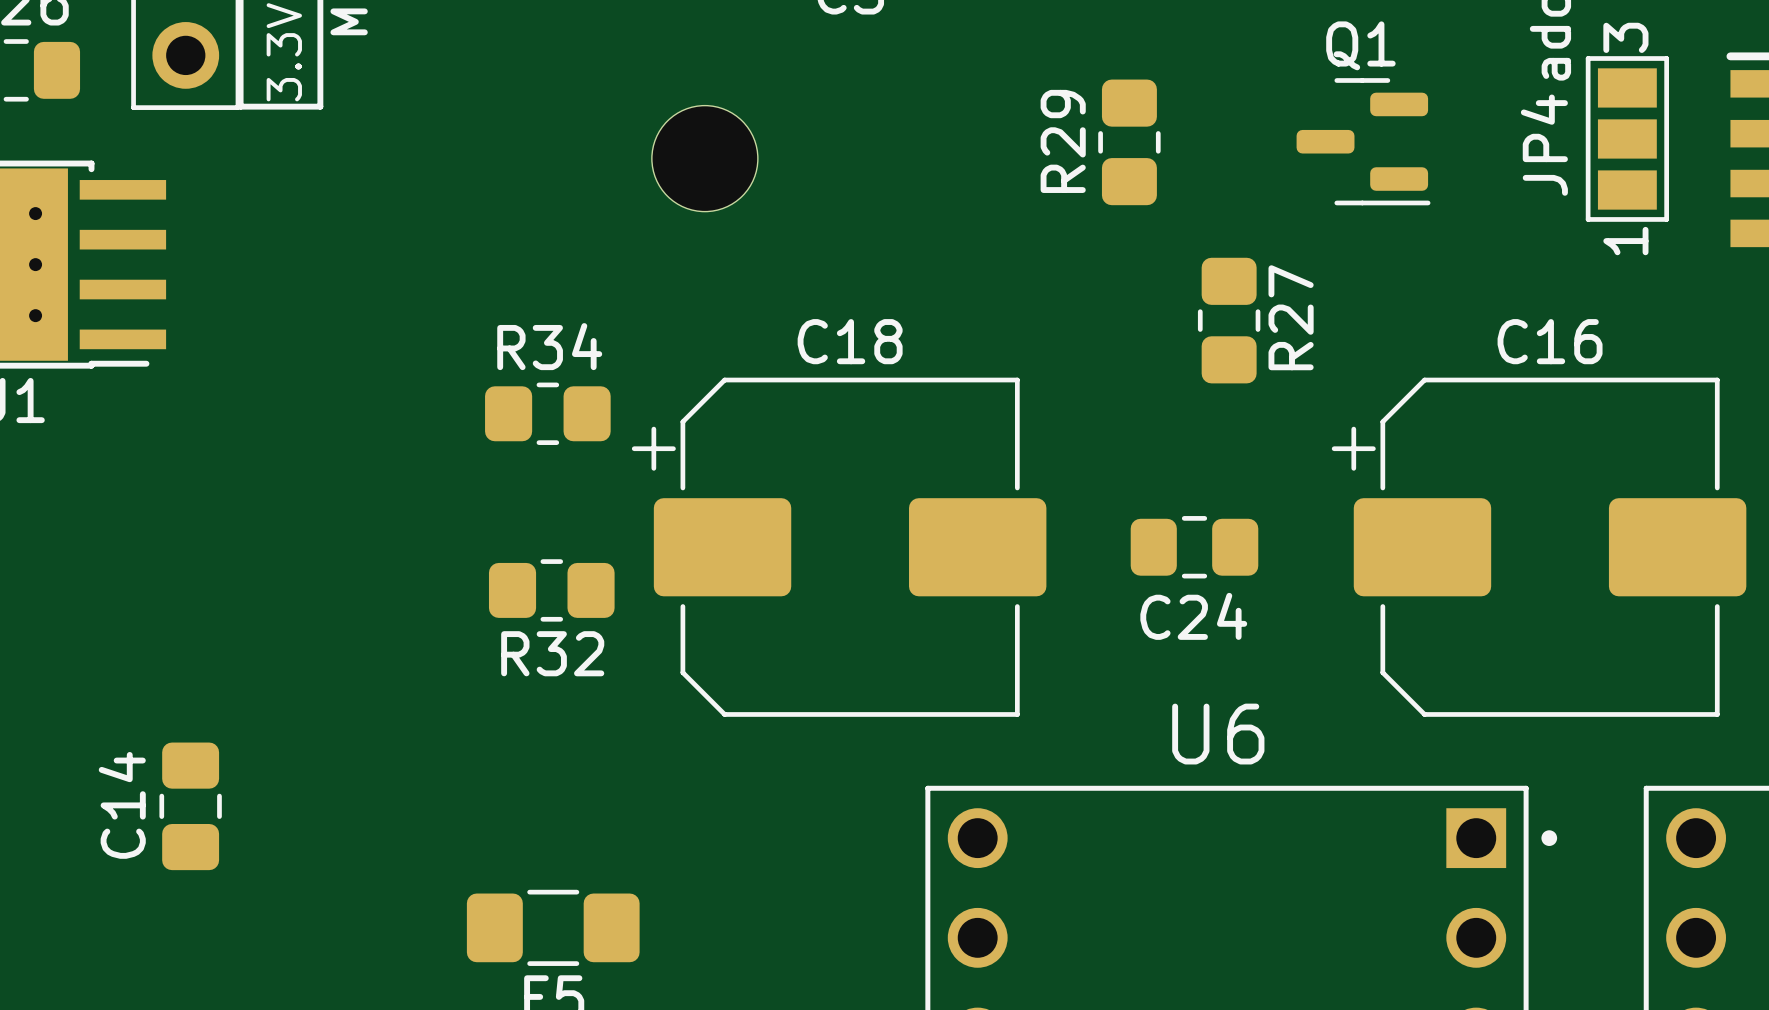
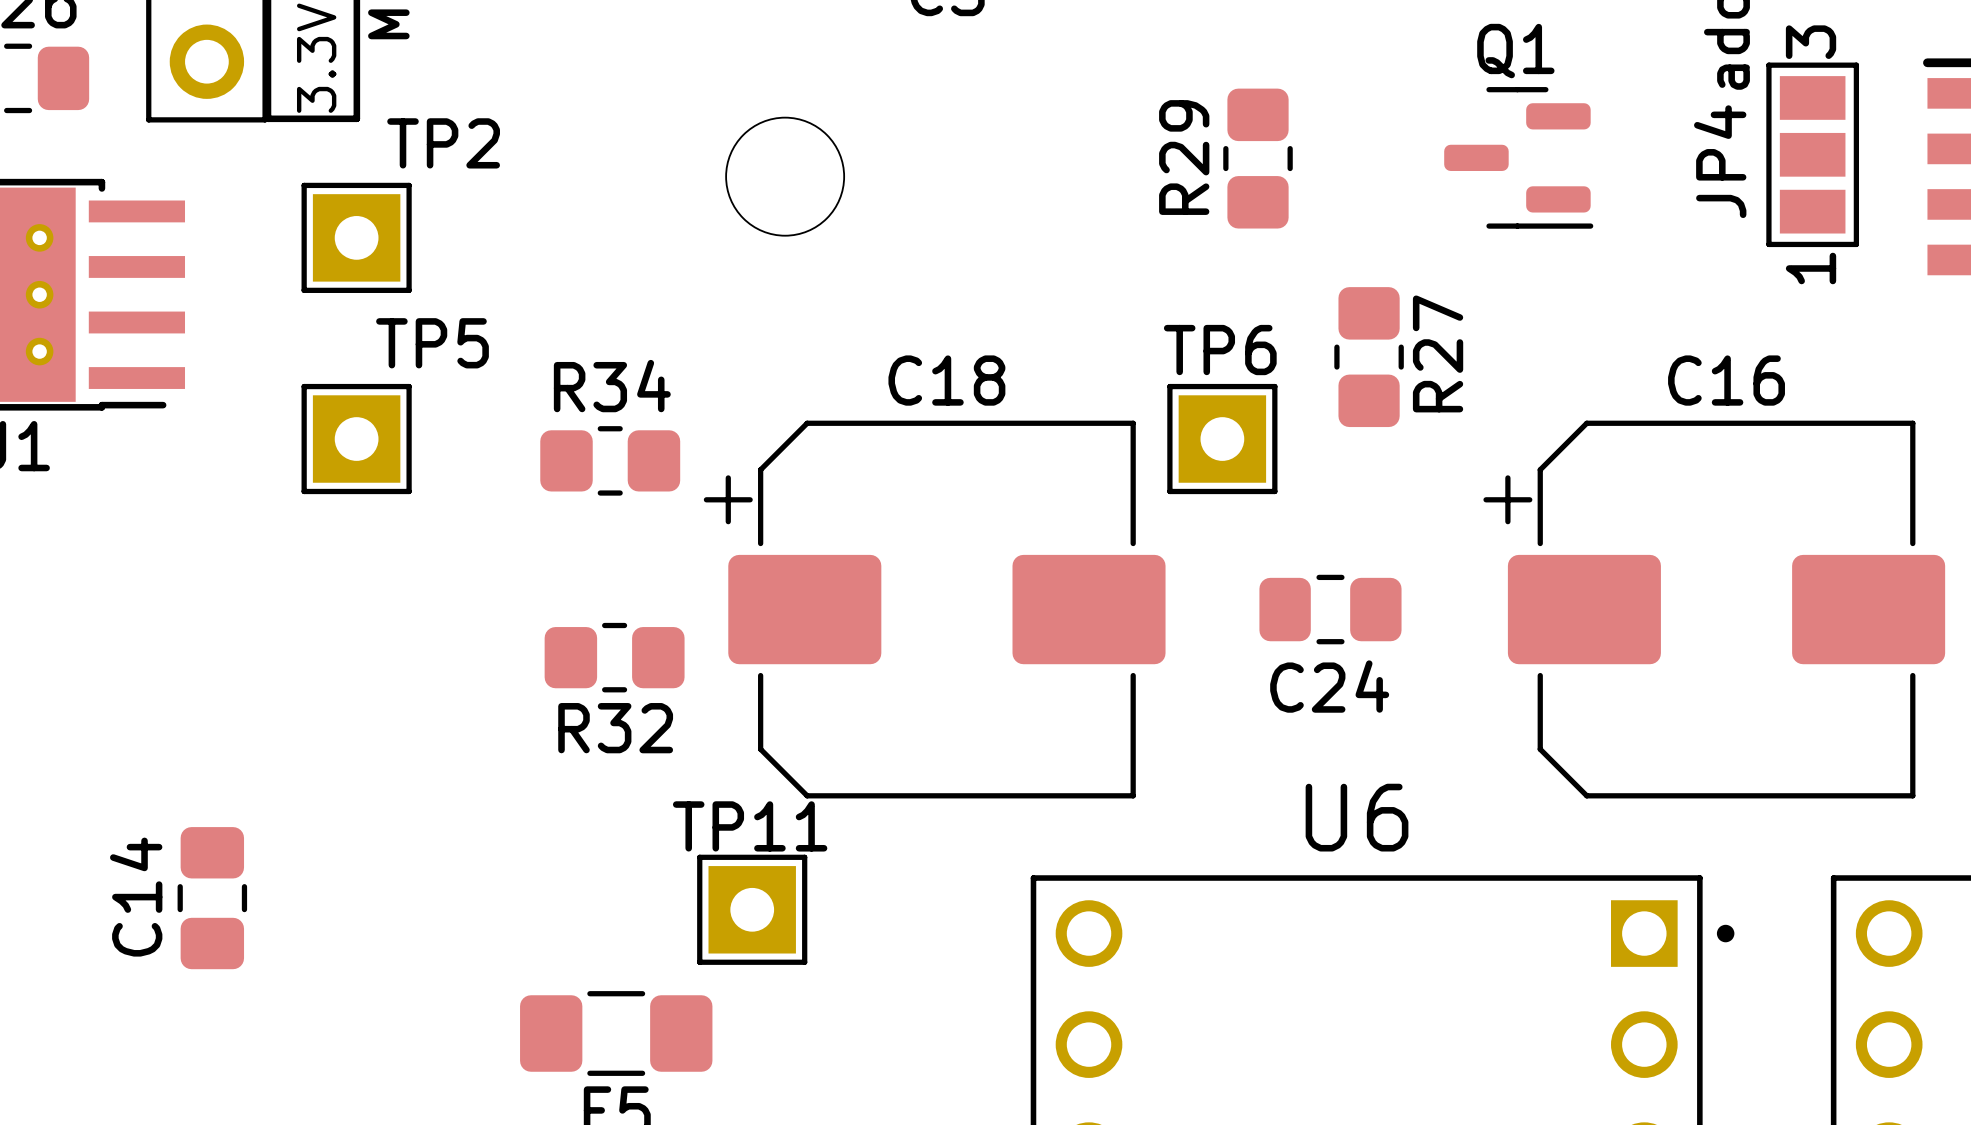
TP2: none -> (356, 237)
TP5: none -> (356, 439)
TP6: none -> (1222, 439)
TP11: none -> (752, 909)

